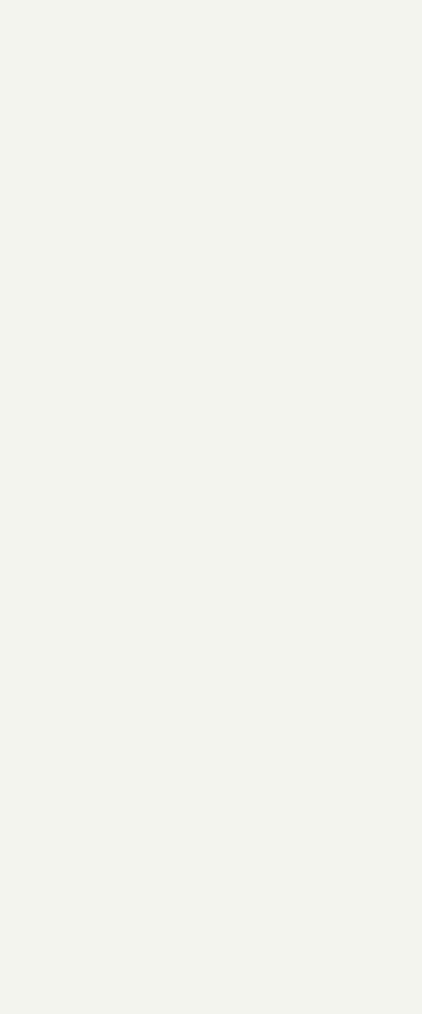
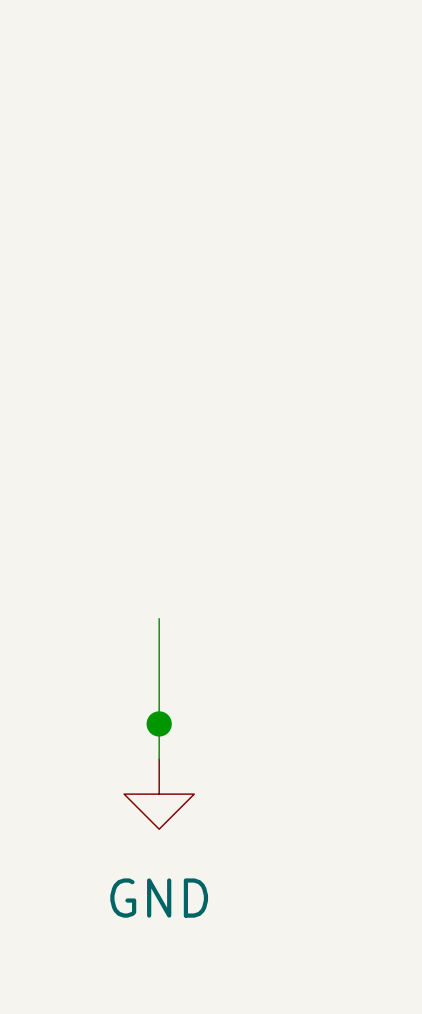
wire: none -> (159, 618) (159, 759)
junction: none -> (159, 723)
power symbol: none -> GND (159, 794)

